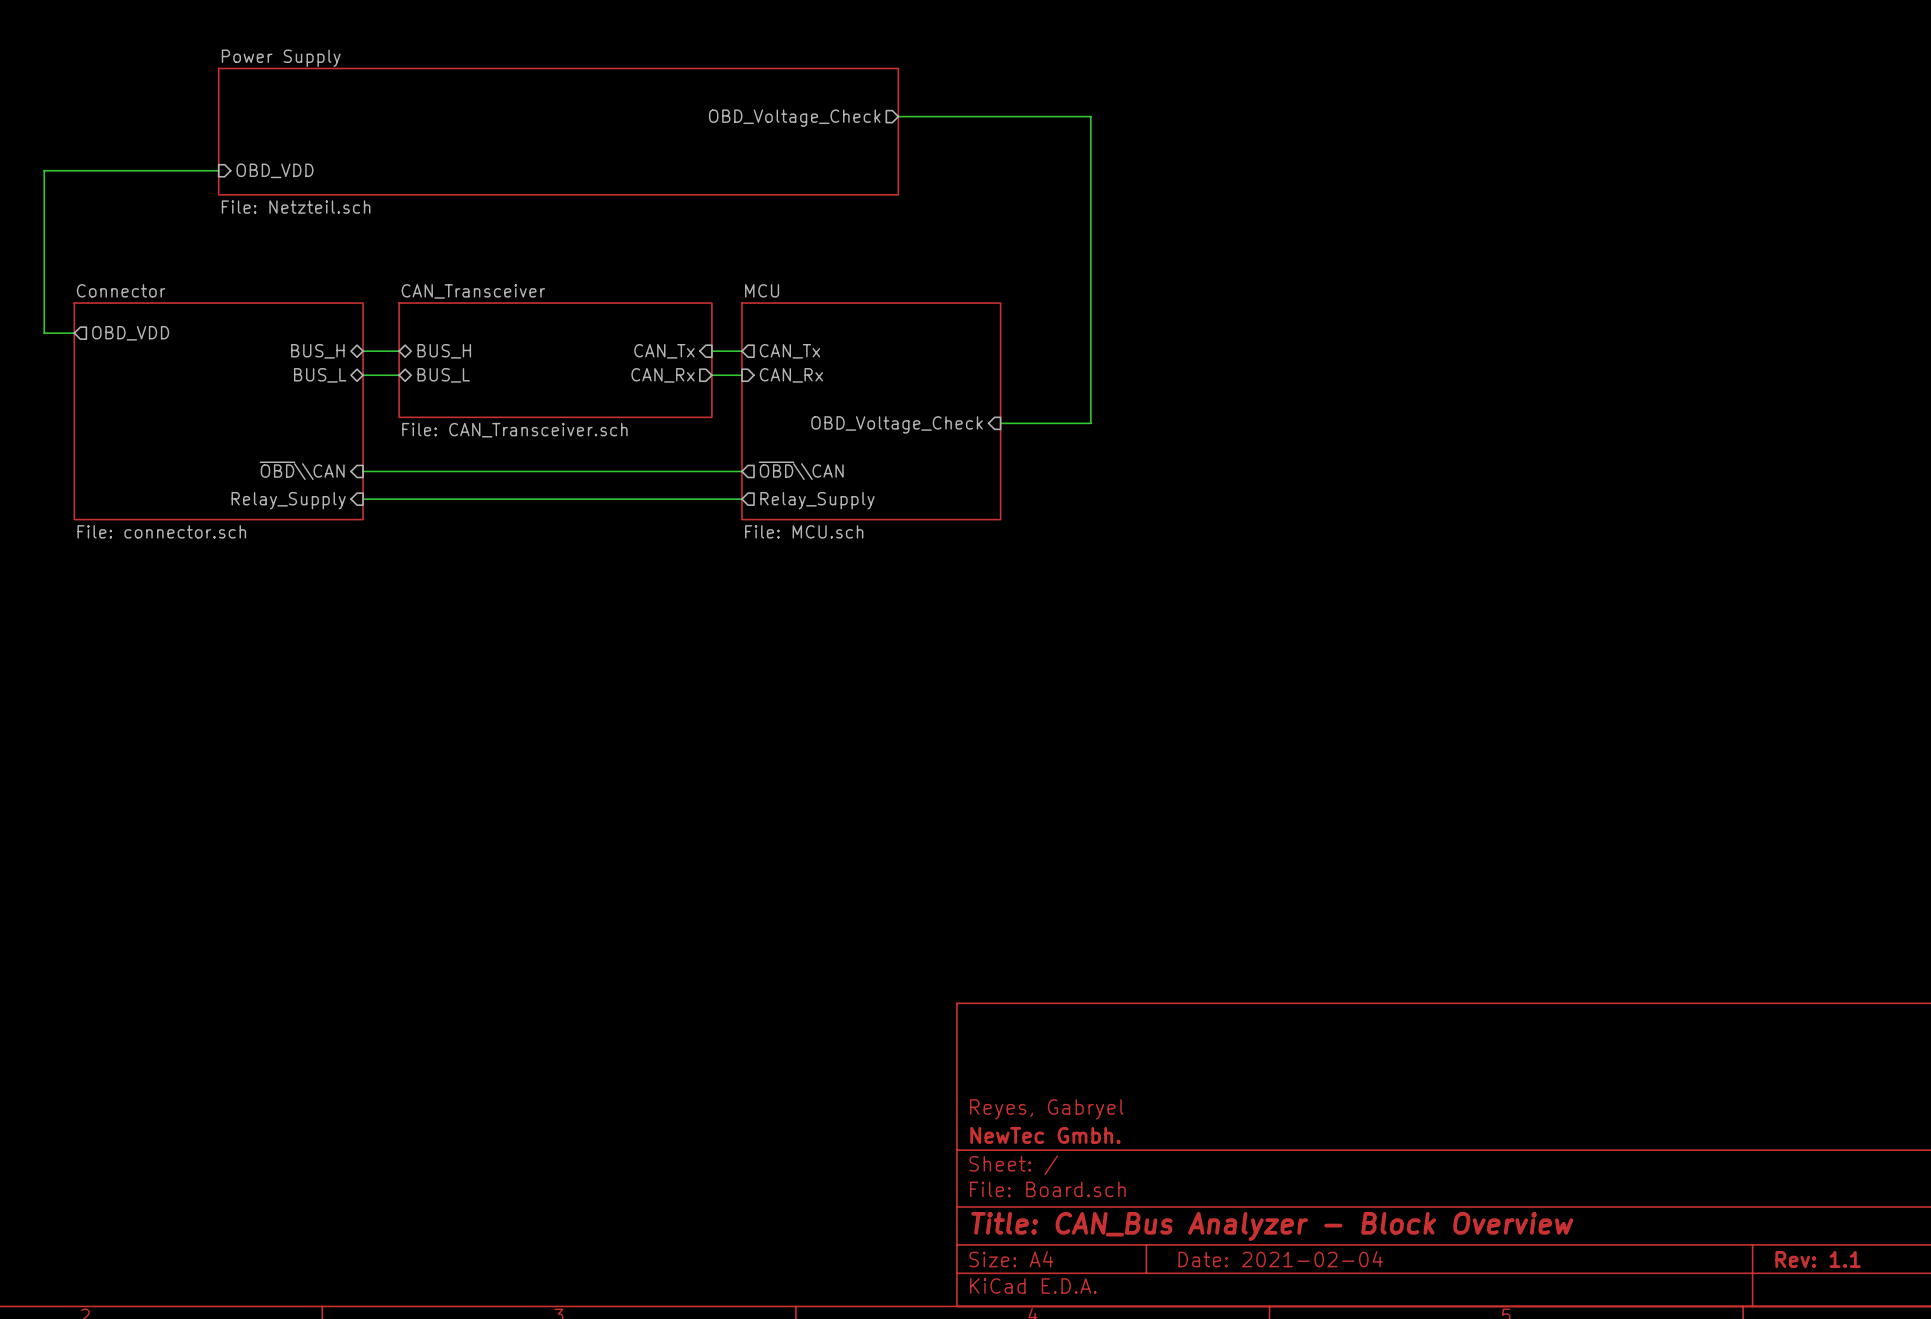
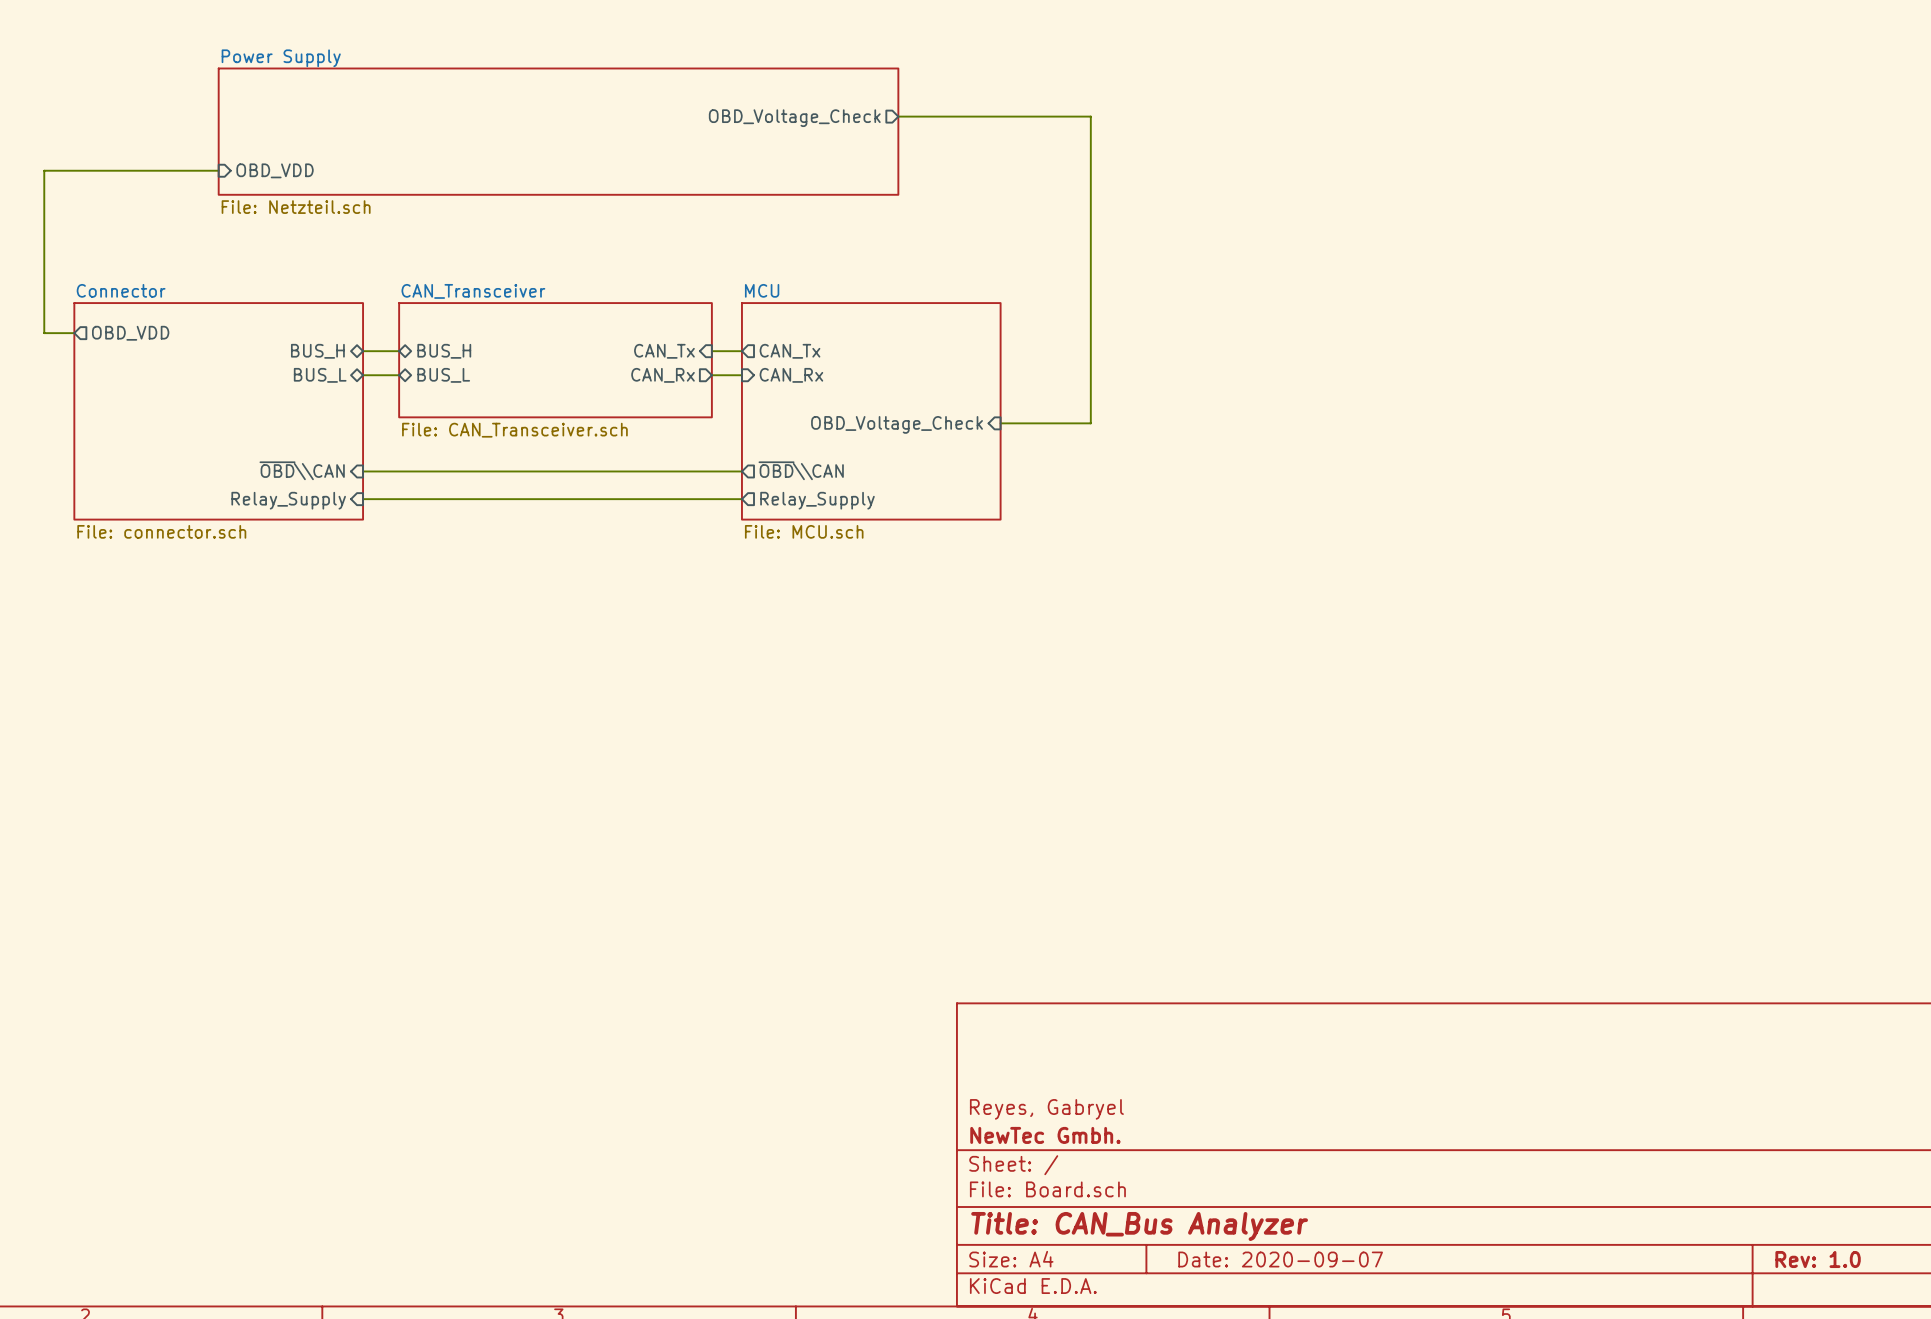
title block: Title: CAN_Bus Analyzer - Block Overview (1272, 1226) -> Title: CAN_Bus Analyzer (1139, 1226)
title block: Date: 2021-02-04 (1280, 1259) -> Date: 2020-09-07 (1280, 1259)
title block: Rev: 1.1 (1818, 1259) -> Rev: 1.0 (1818, 1259)

